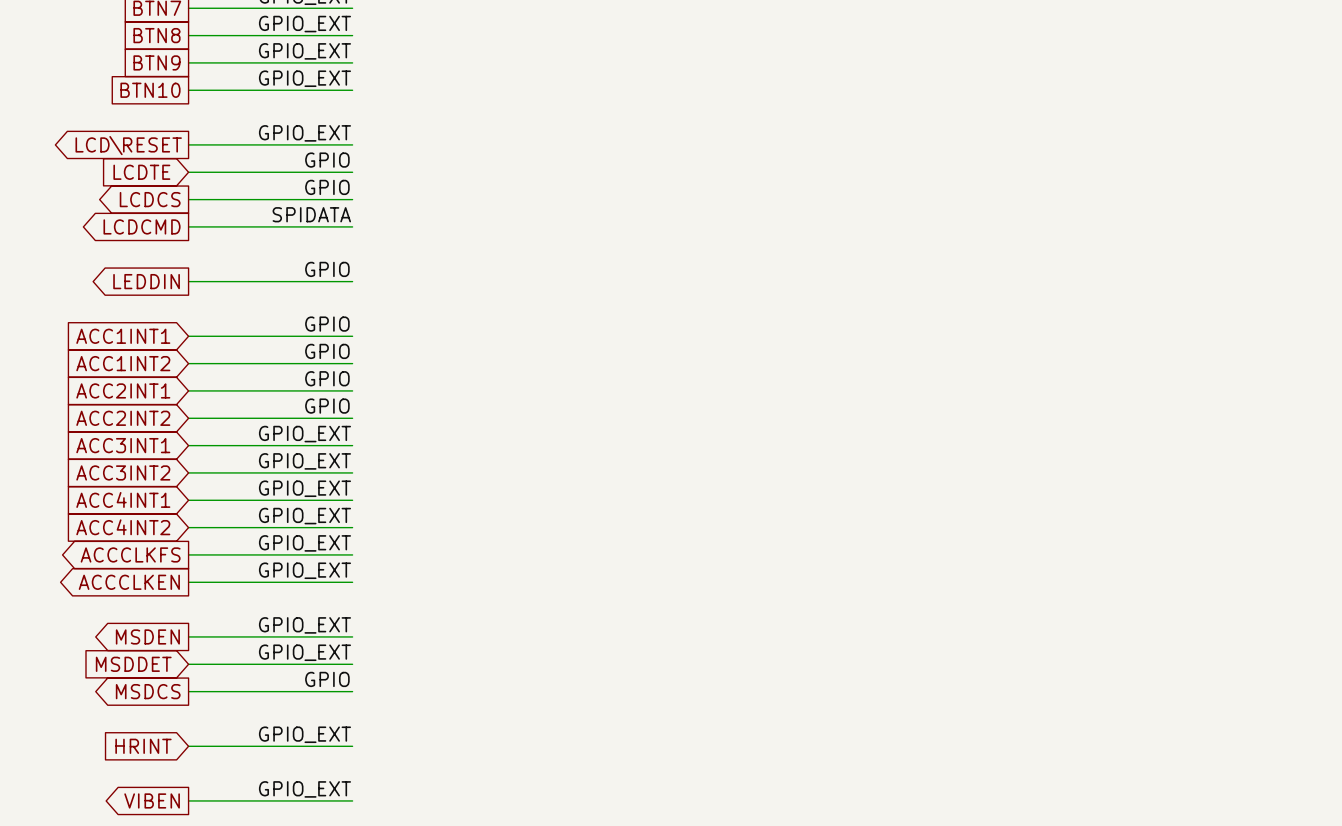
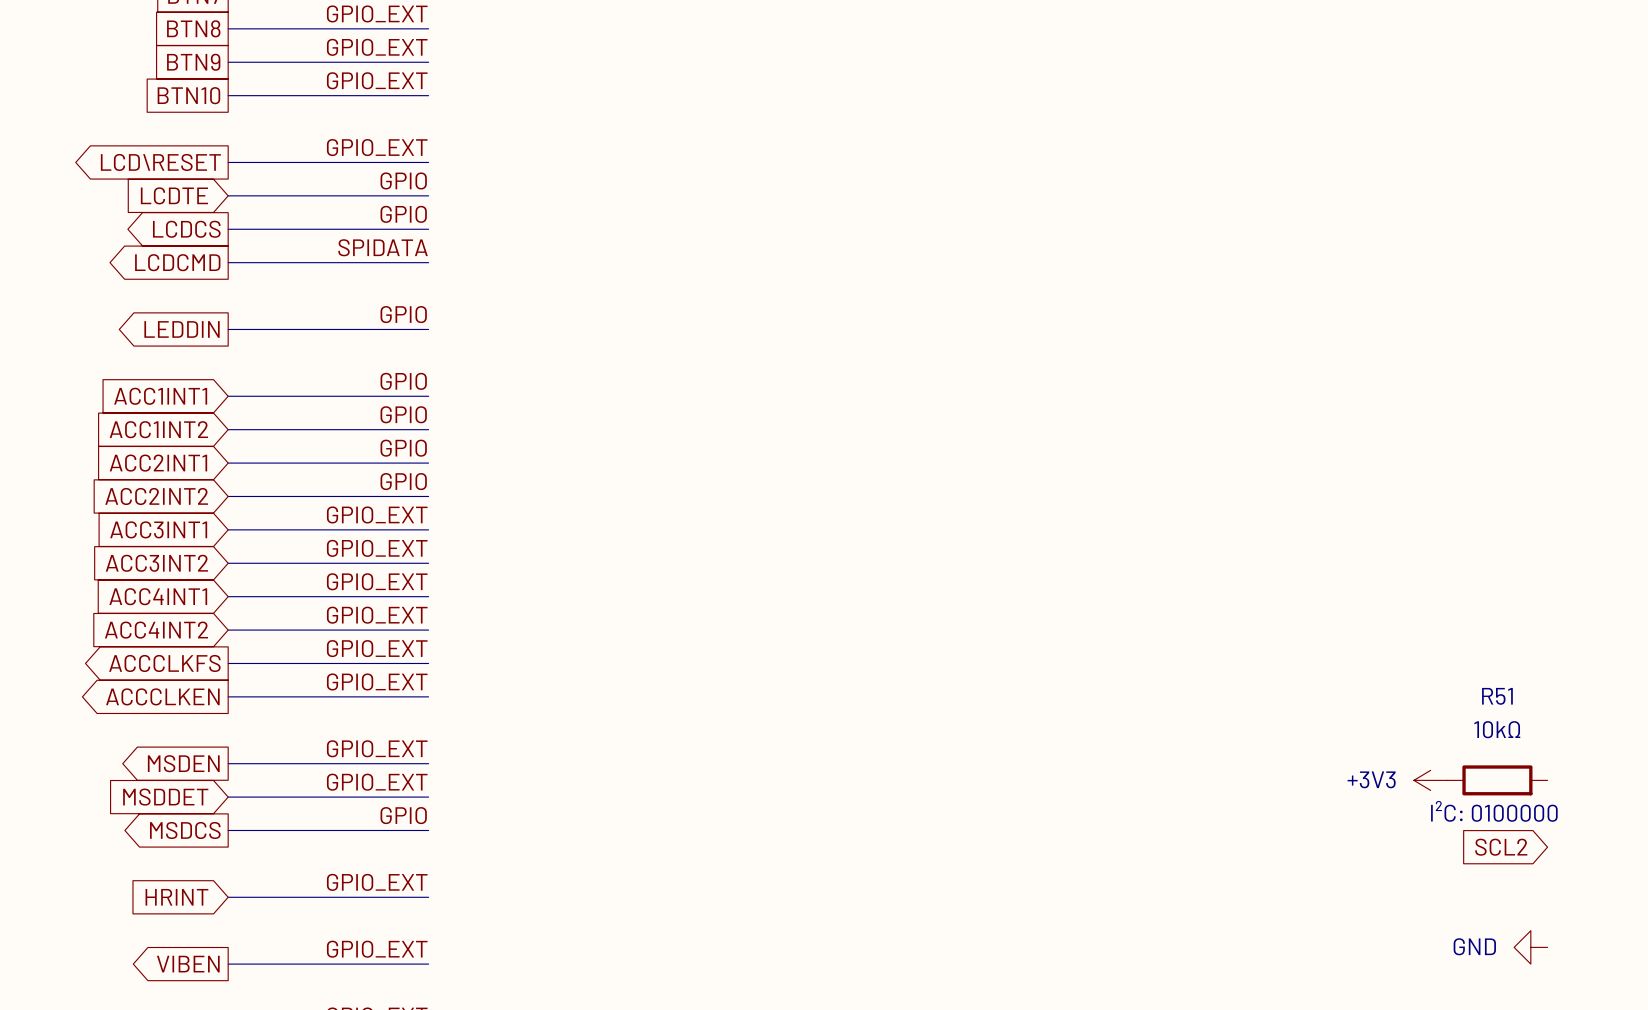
power symbol: none -> +3V3 (1430, 780)
R51: none -> 10kΩ (1497, 780)
text: none -> I²C: 0100000 (1494, 811)
global label: none -> SCL2 (1501, 847)
power symbol: none -> GND (1530, 947)

